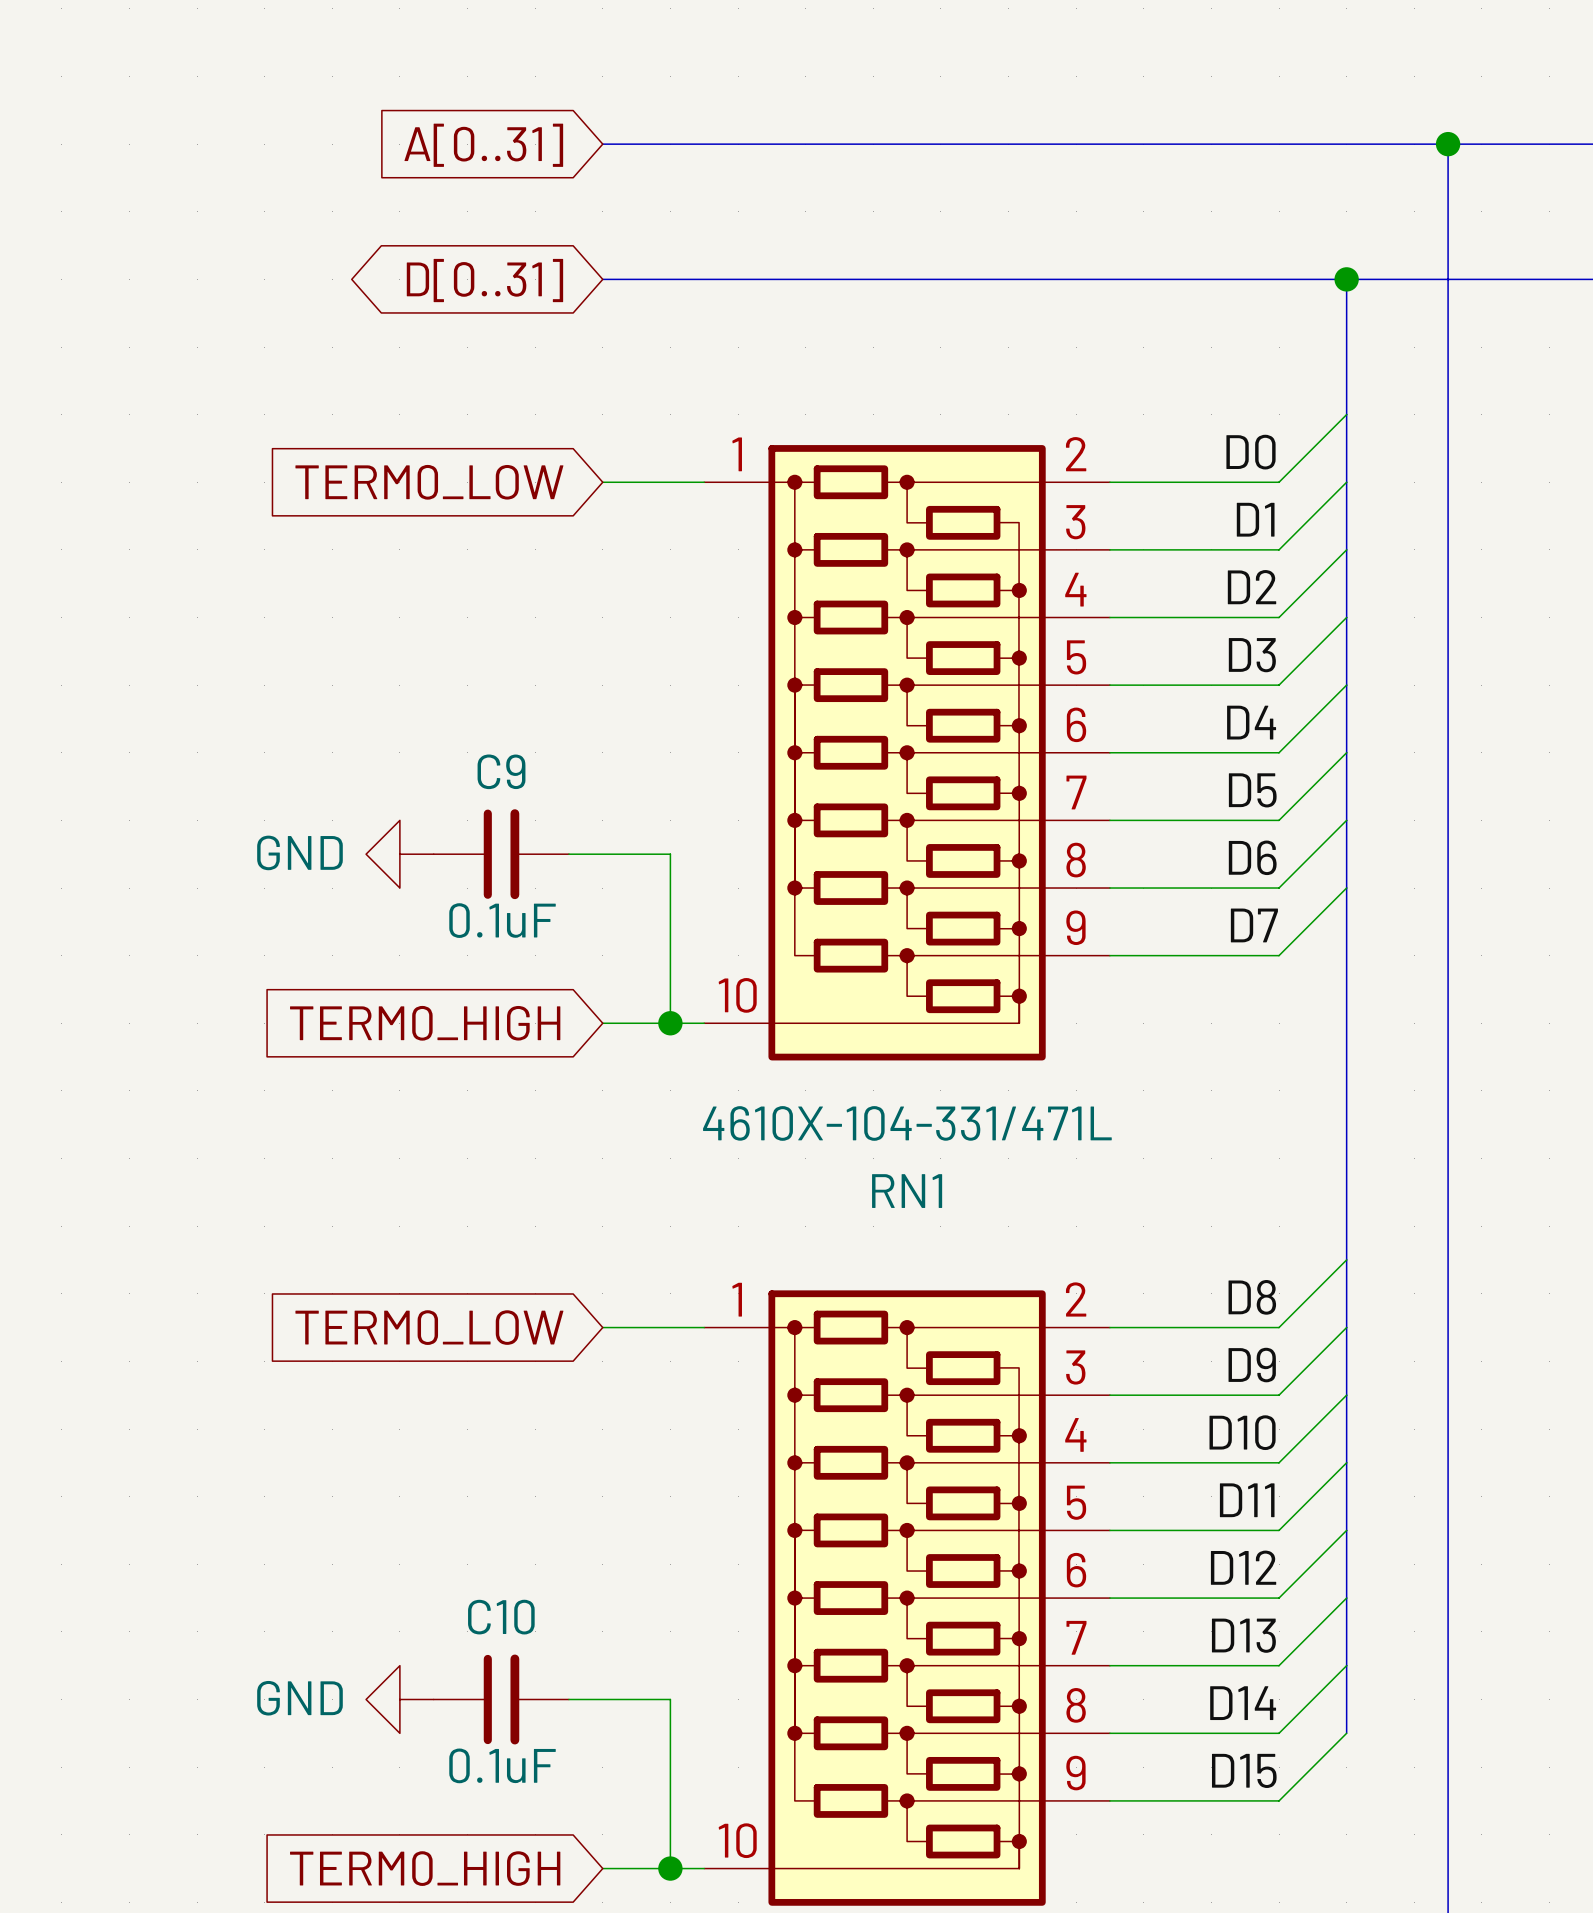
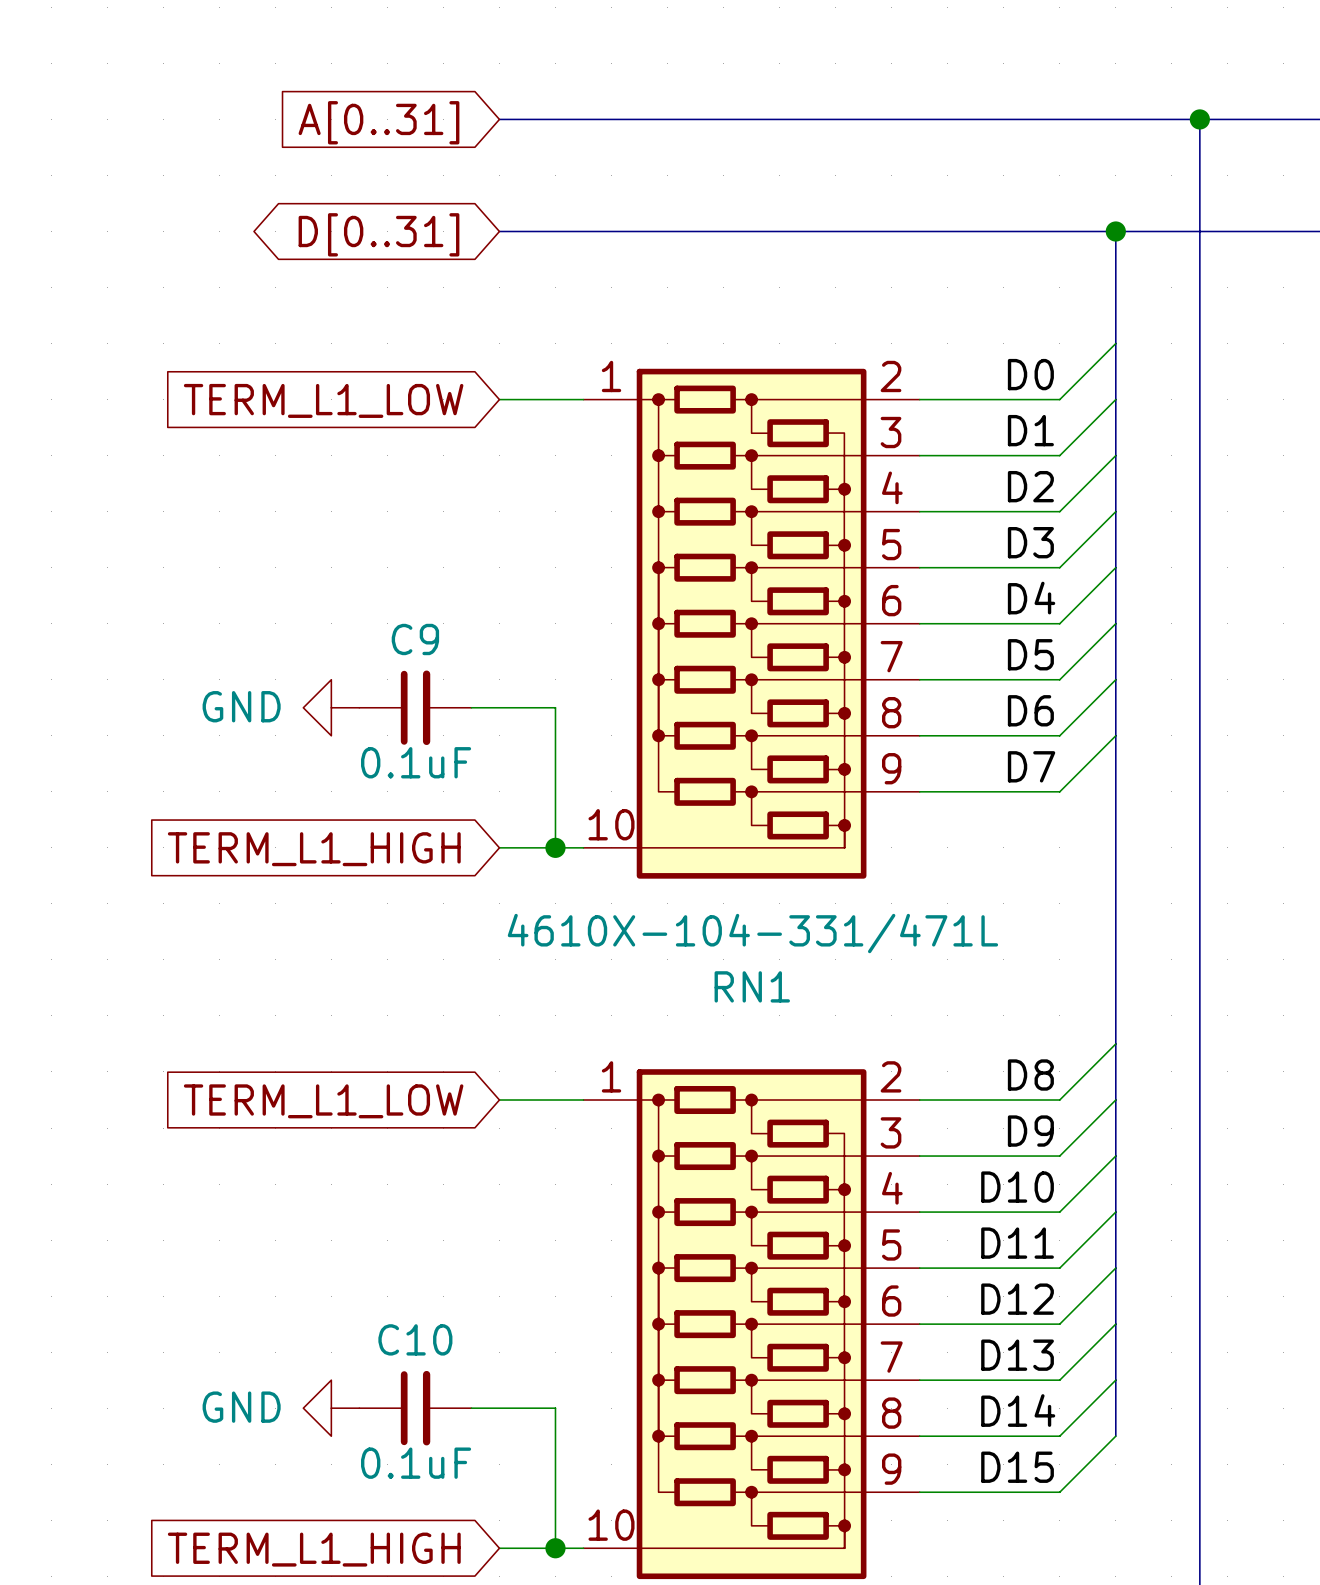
global label: TERM0_LOW (429, 482) -> TERM_L1_LOW (323, 400)
global label: TERM0_HIGH (425, 1023) -> TERM_L1_HIGH (314, 849)
global label: TERM0_LOW (429, 1327) -> TERM_L1_LOW (323, 1101)
global label: TERM0_HIGH (425, 1868) -> TERM_L1_HIGH (314, 1549)

